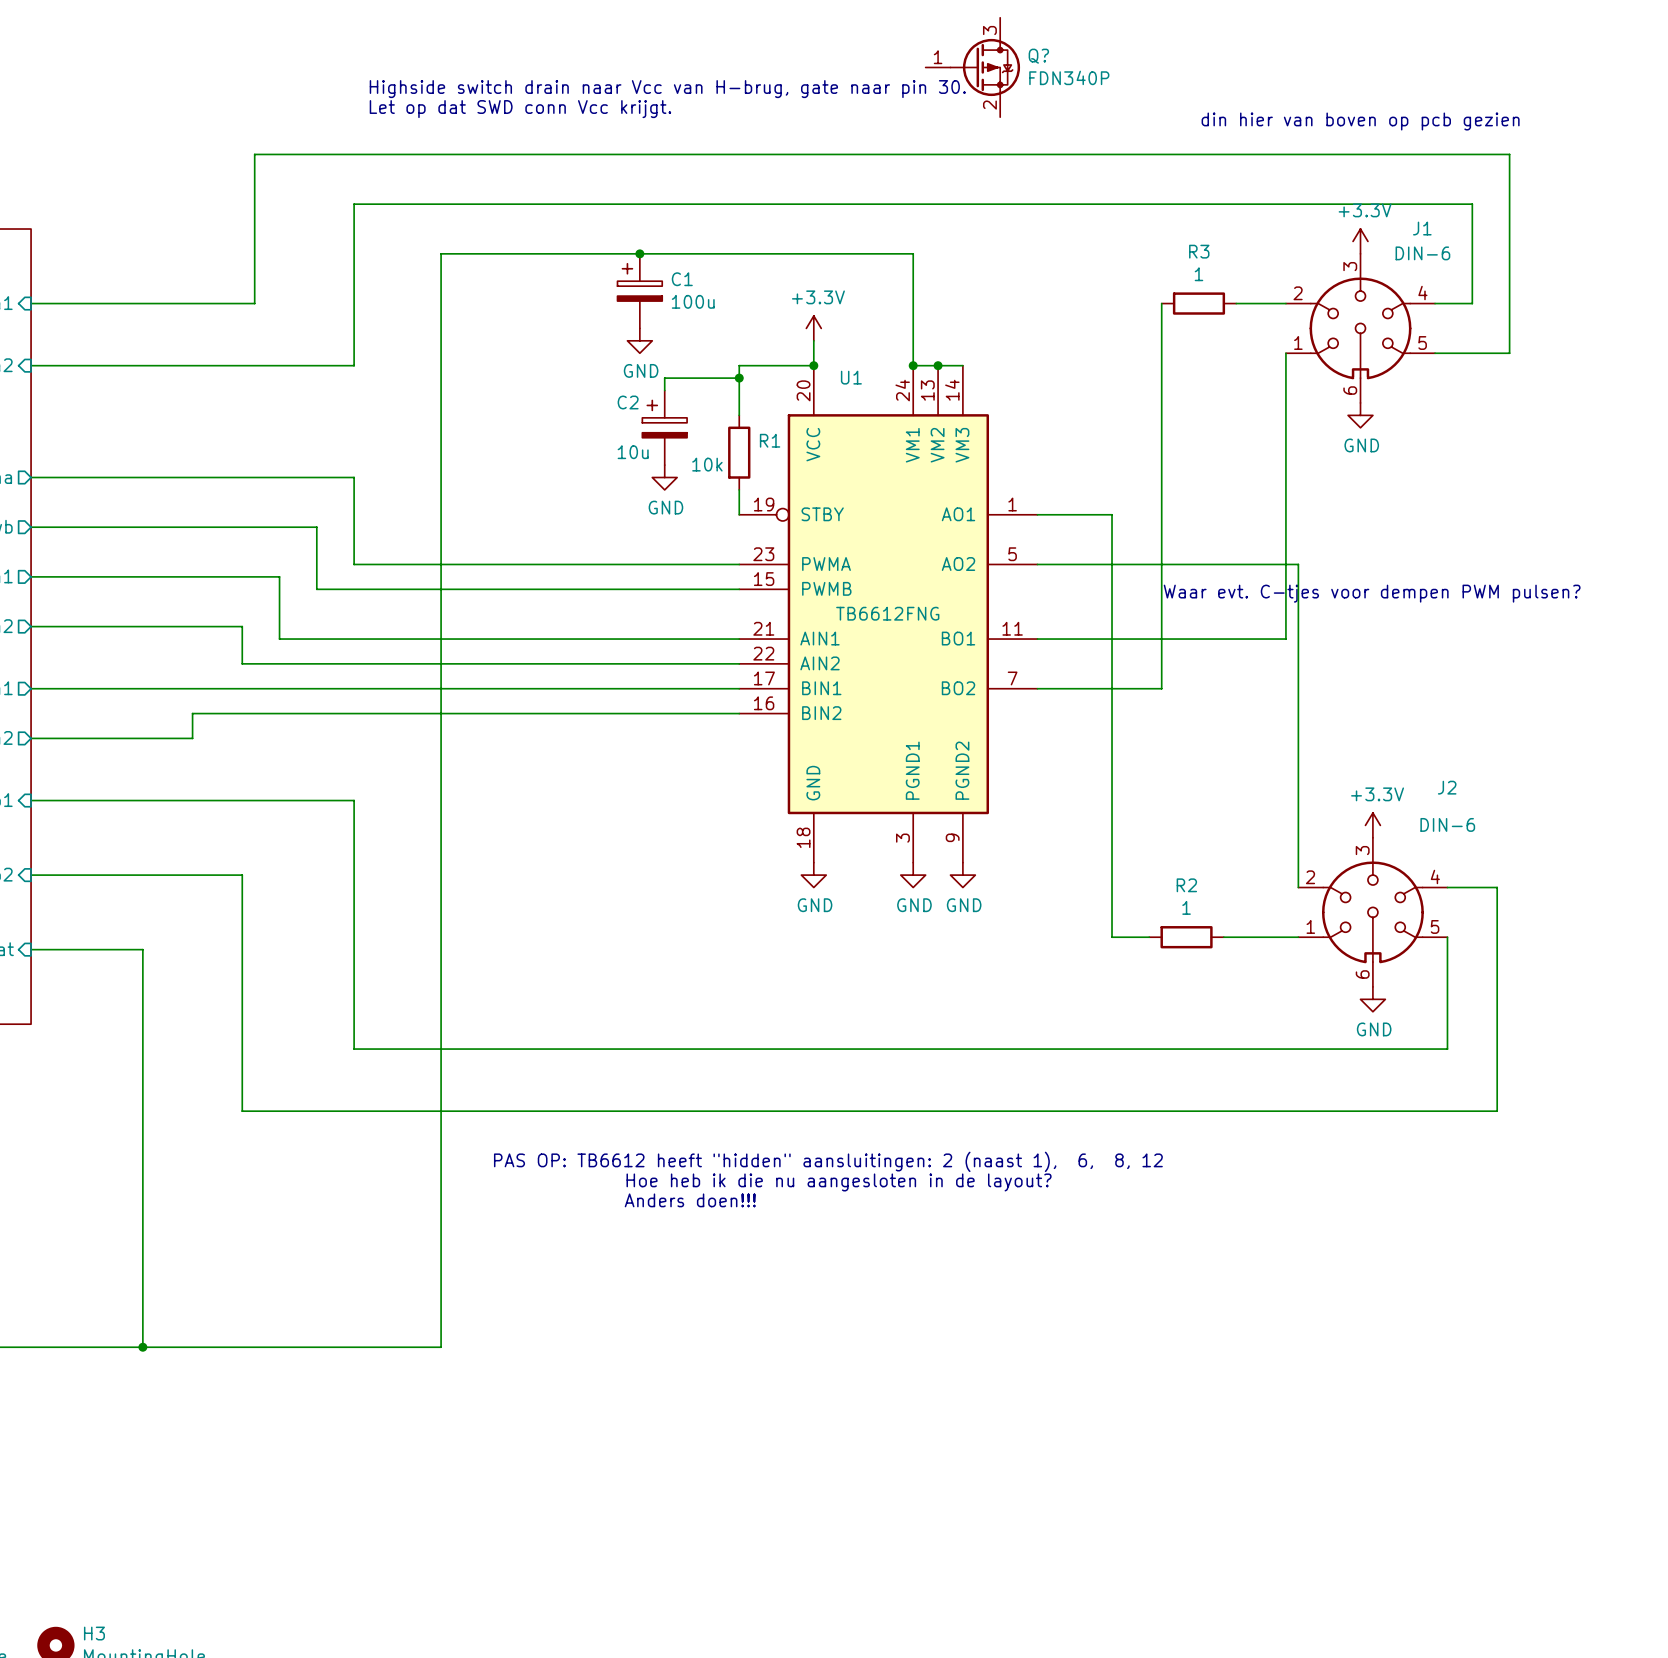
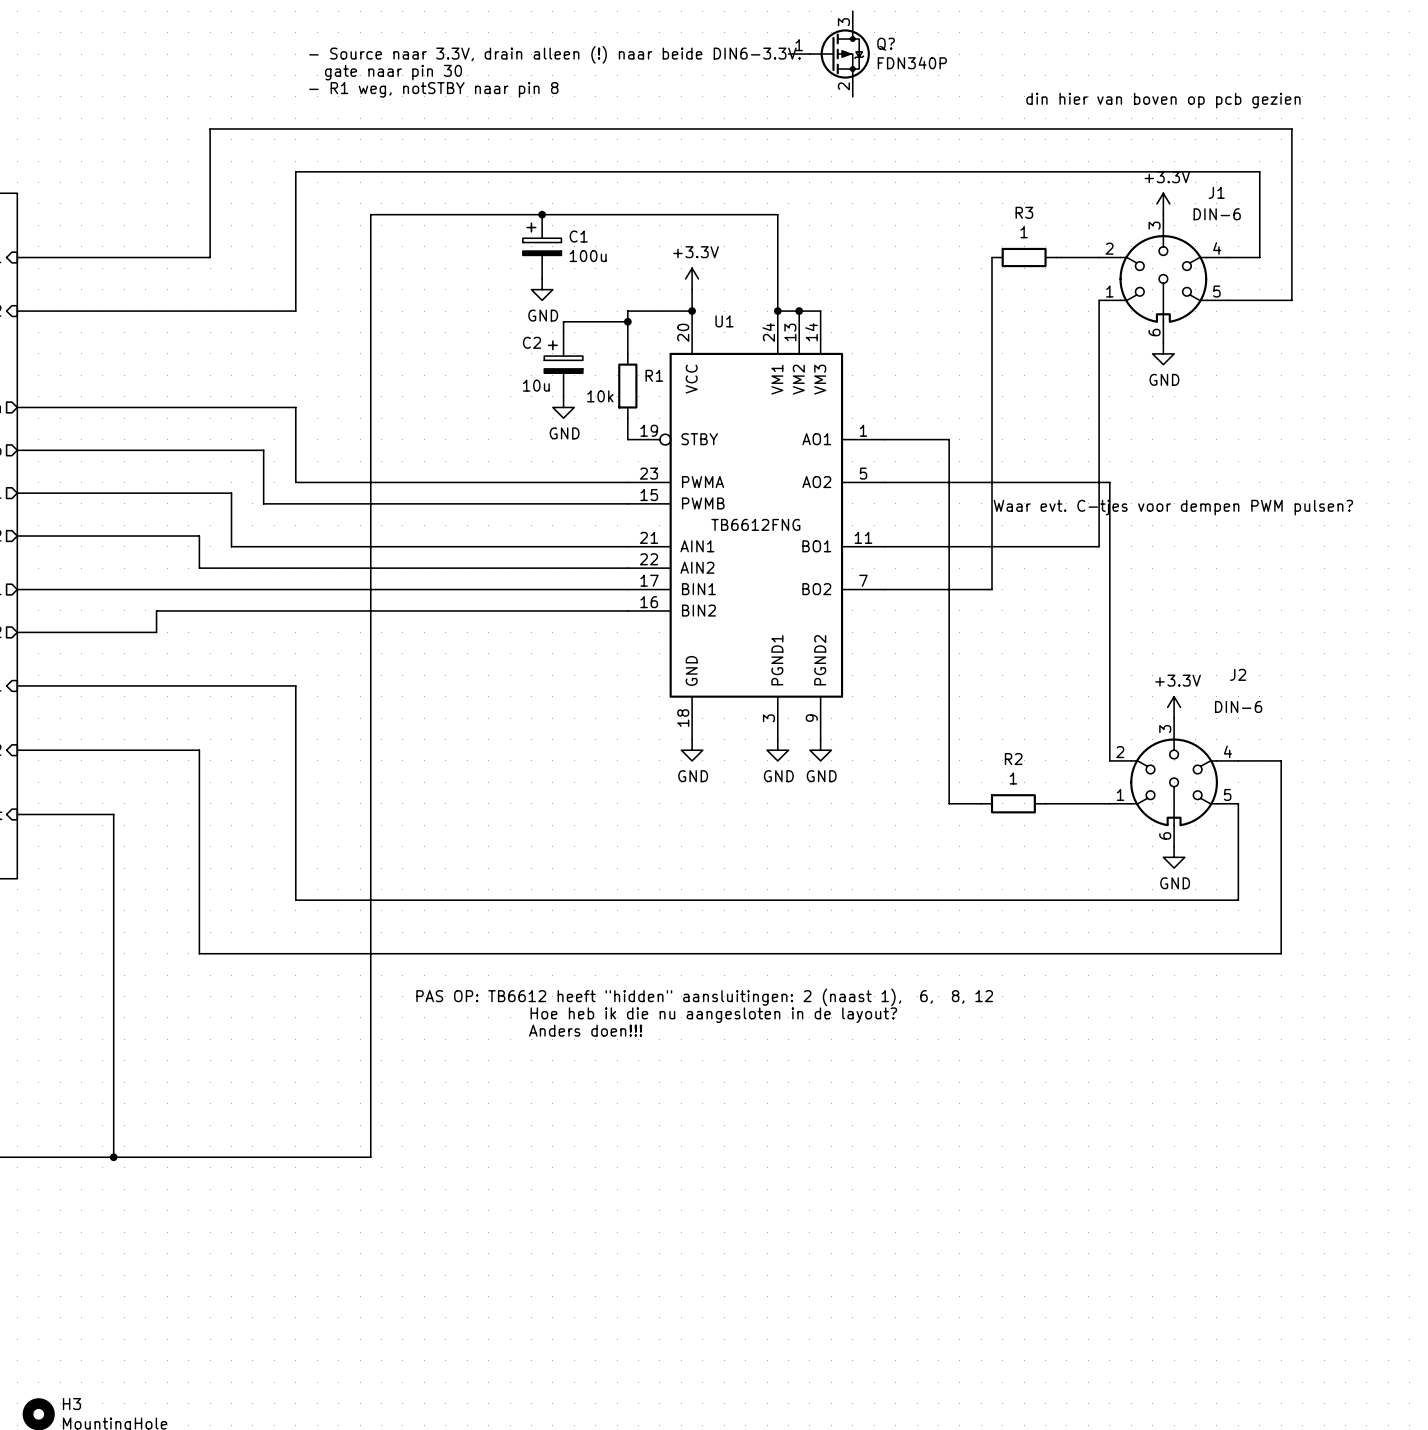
text: none -> - Source naar 3.3V, drain alleen (!) naar beide DIN6-3.3V. (554, 54)
text: Highside switch drain naar Vcc van H-brug, gate naar pin 30. (667, 89) -> gate naar pin 30 (393, 72)
text: Let op dat SWD conn Vcc krijgt. (520, 109) -> - R1 weg, notSTBY naar pin 8 (433, 89)

